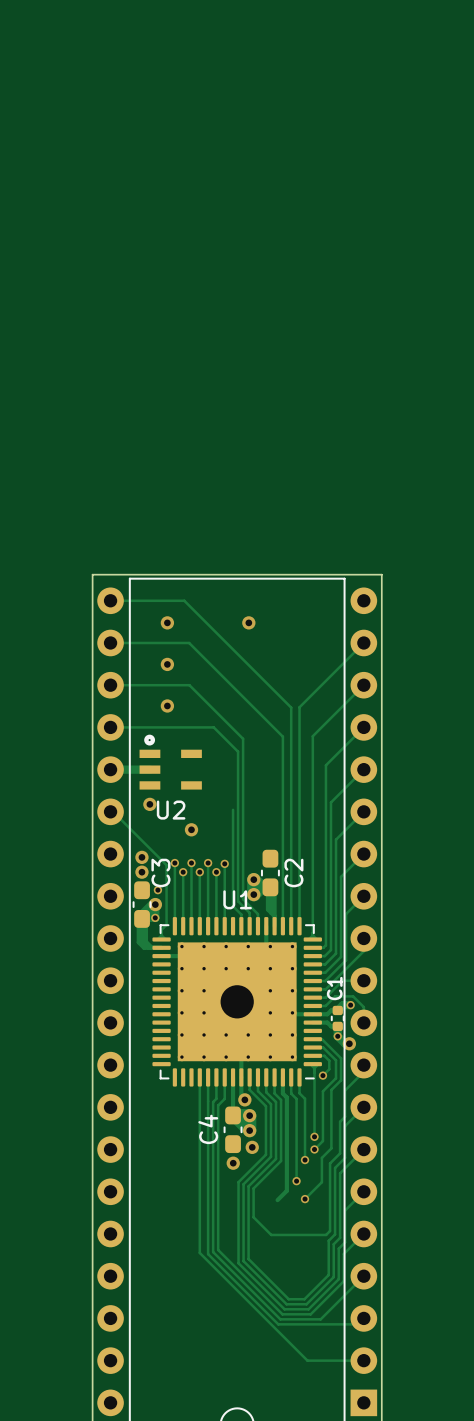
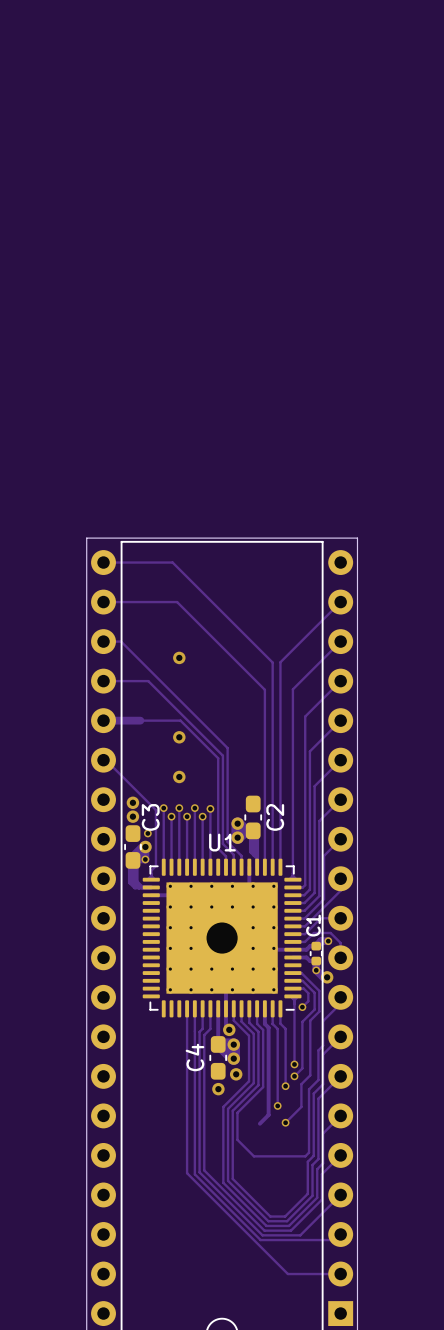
via: (167, 622) -> none
via: (248, 622) -> none
via: (167, 664) -> none
track: (129, 685) (189, 685) (243, 738) (243, 798) -> (121, 641) (227, 748)
via: none -> (179, 657)
via: (167, 705) -> none
track: (158, 727) (213, 727) (238, 751) (238, 807) -> (148, 681) (222, 755)
U2: (170, 762) -> none
track: none -> (140, 720) (180, 720) (218, 758)
via: none -> (179, 737)
via: (149, 804) -> none

